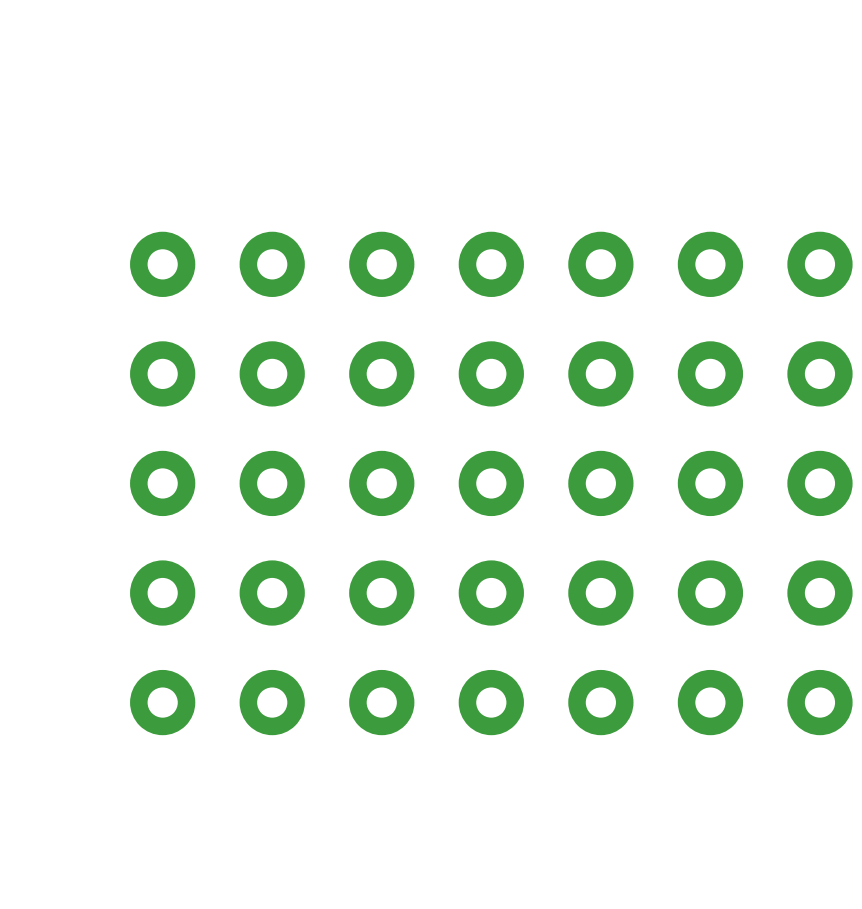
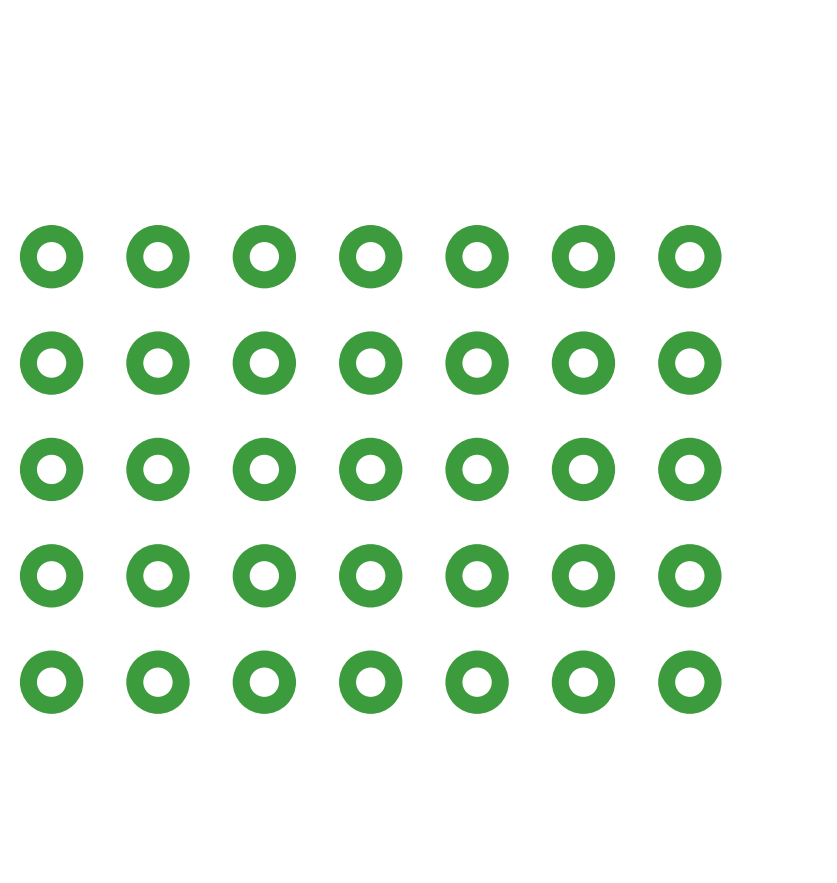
via: none -> (51, 256)
via: (819, 264) -> none
via: none -> (51, 363)
via: (819, 373) -> none
via: none -> (51, 469)
via: (819, 483) -> none
via: none -> (51, 575)
via: (819, 593) -> none
via: none -> (51, 682)
via: (819, 702) -> none

